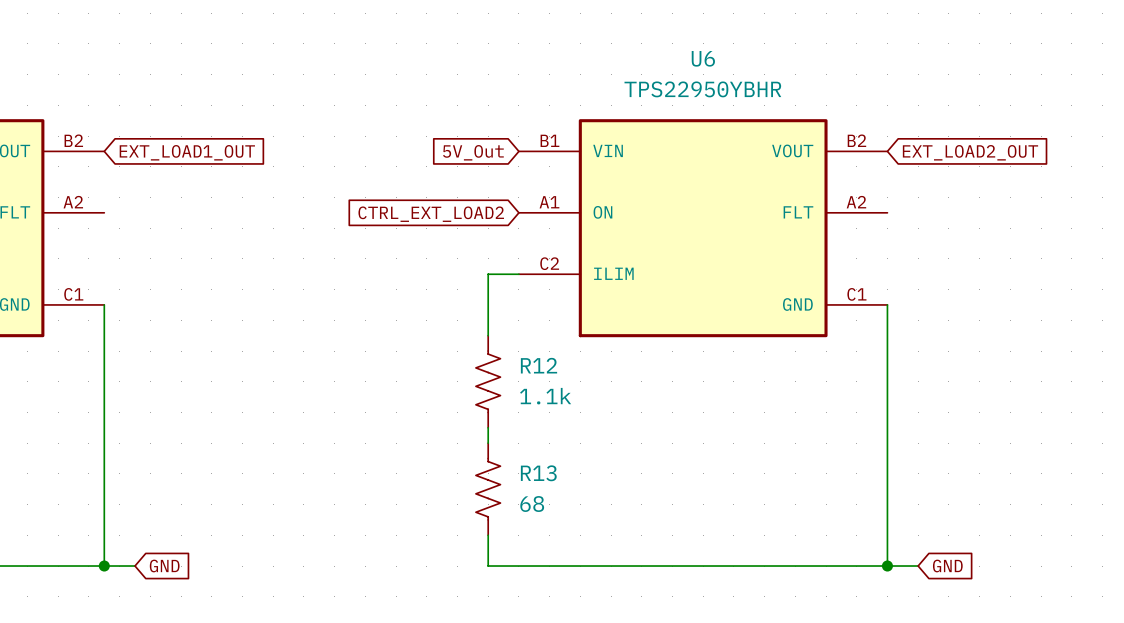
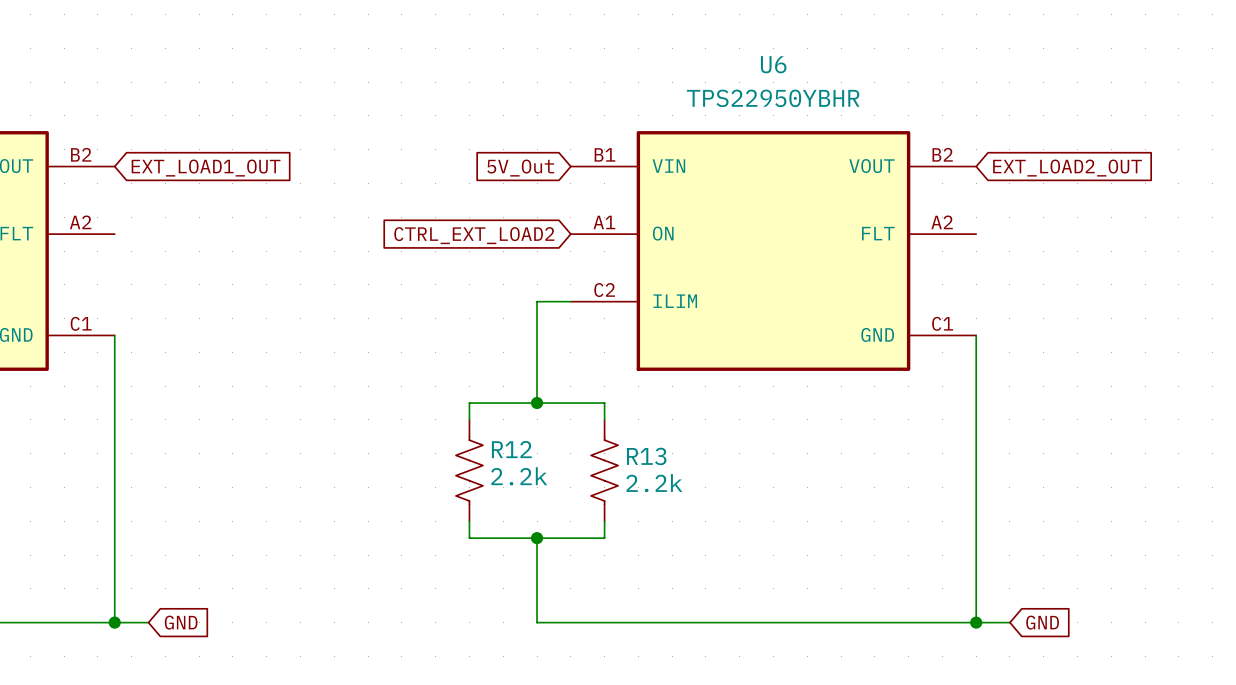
R12 name position: R12 (539, 365) -> R12 (511, 449)
junction: none -> (537, 403)
wire: none -> (469, 419) (469, 403) (604, 403) (604, 419)
R12 position: (488, 381) -> (469, 470)
R12 value: 1.1k (545, 396) -> 2.2k (519, 476)
wire: none -> (469, 521) (469, 538) (604, 538) (604, 521)
R13 name position: R13 (538, 473) -> R13 (646, 456)
R13 position: (488, 489) -> (604, 470)
junction: none -> (537, 538)
R13 value: 68 (532, 504) -> 2.2k (654, 483)

